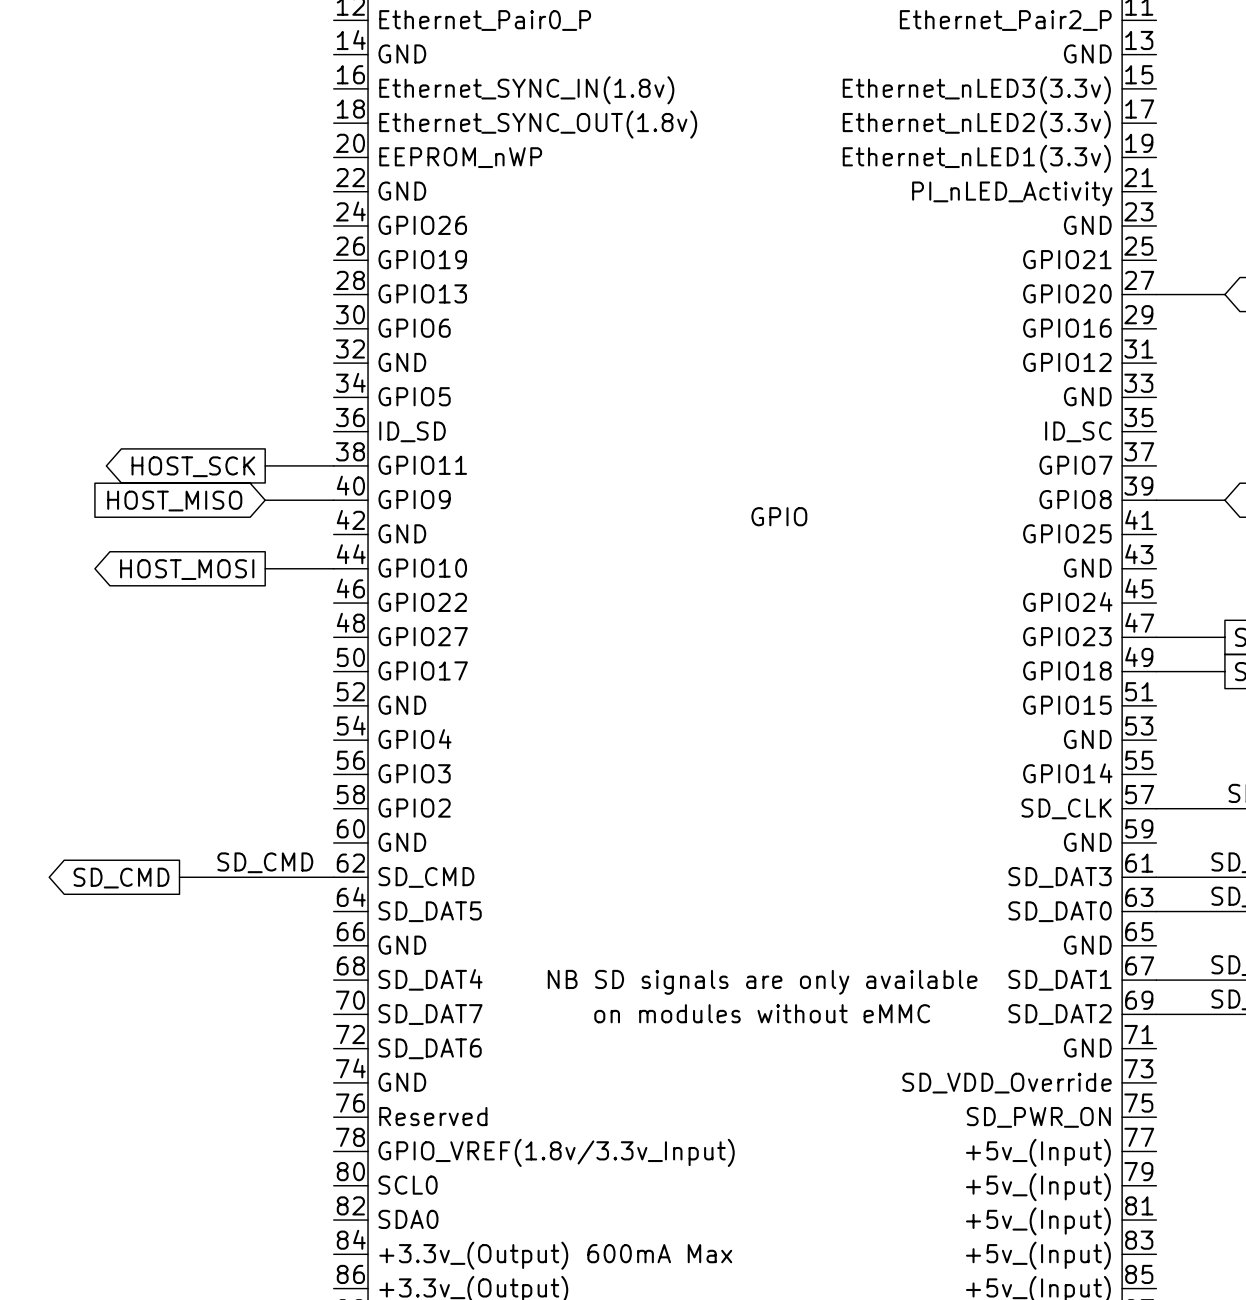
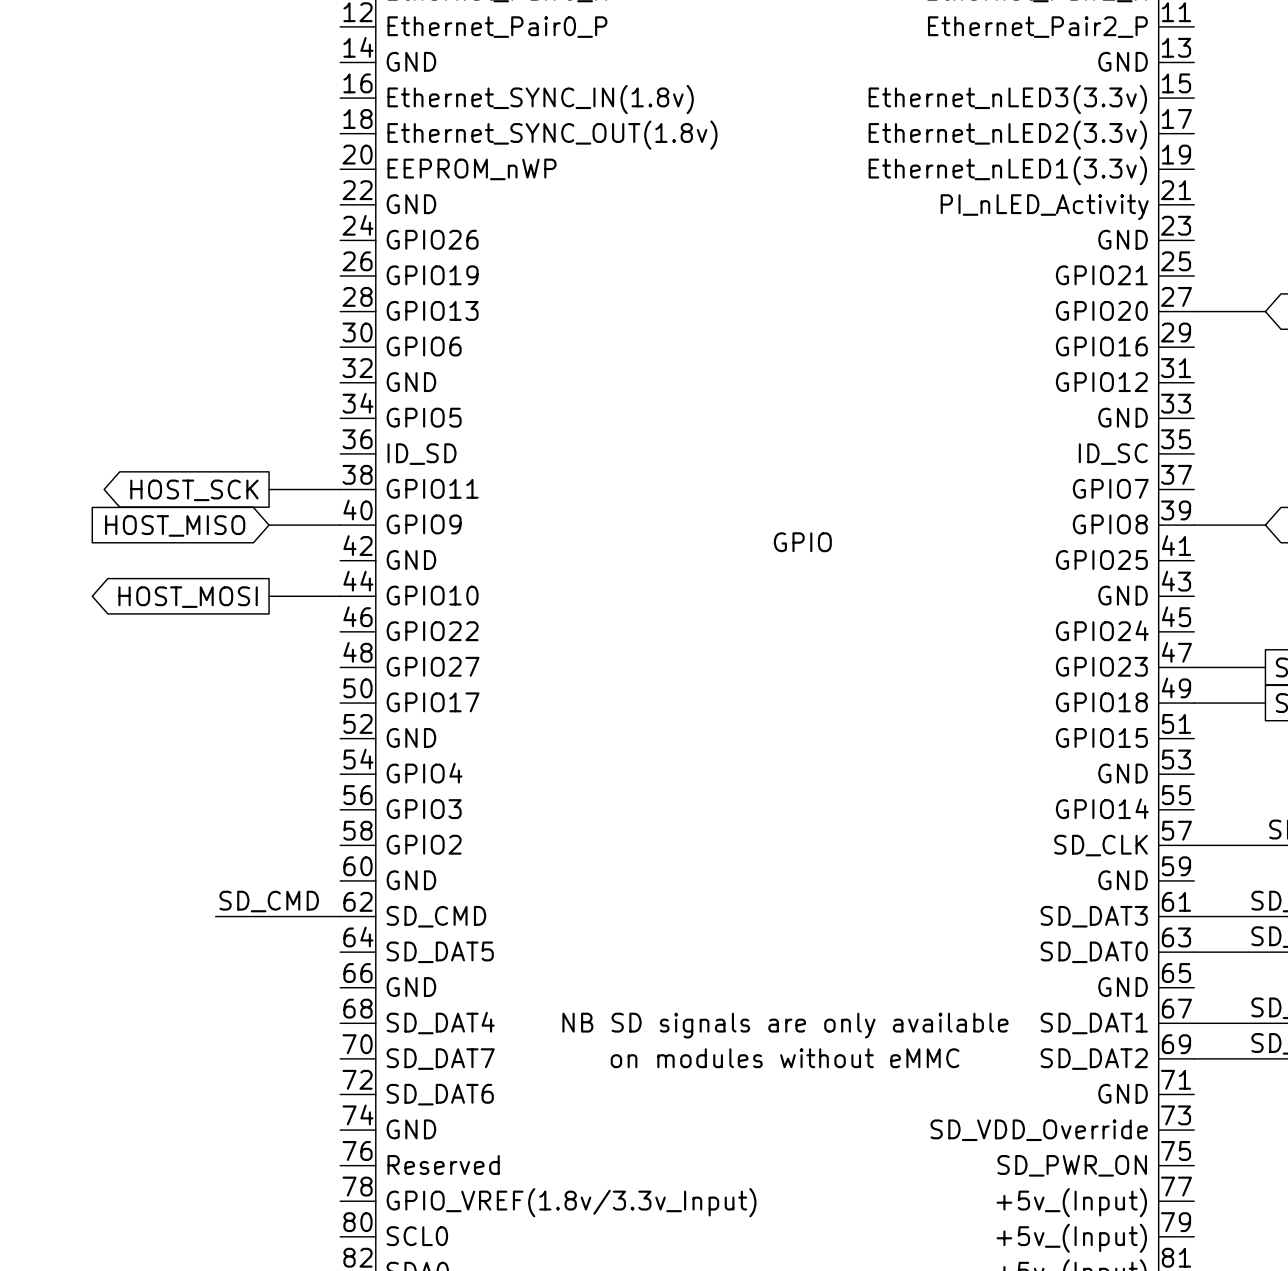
wire: (179, 877) (213, 877) -> none
global label: SD_CMD (121, 878) -> none

